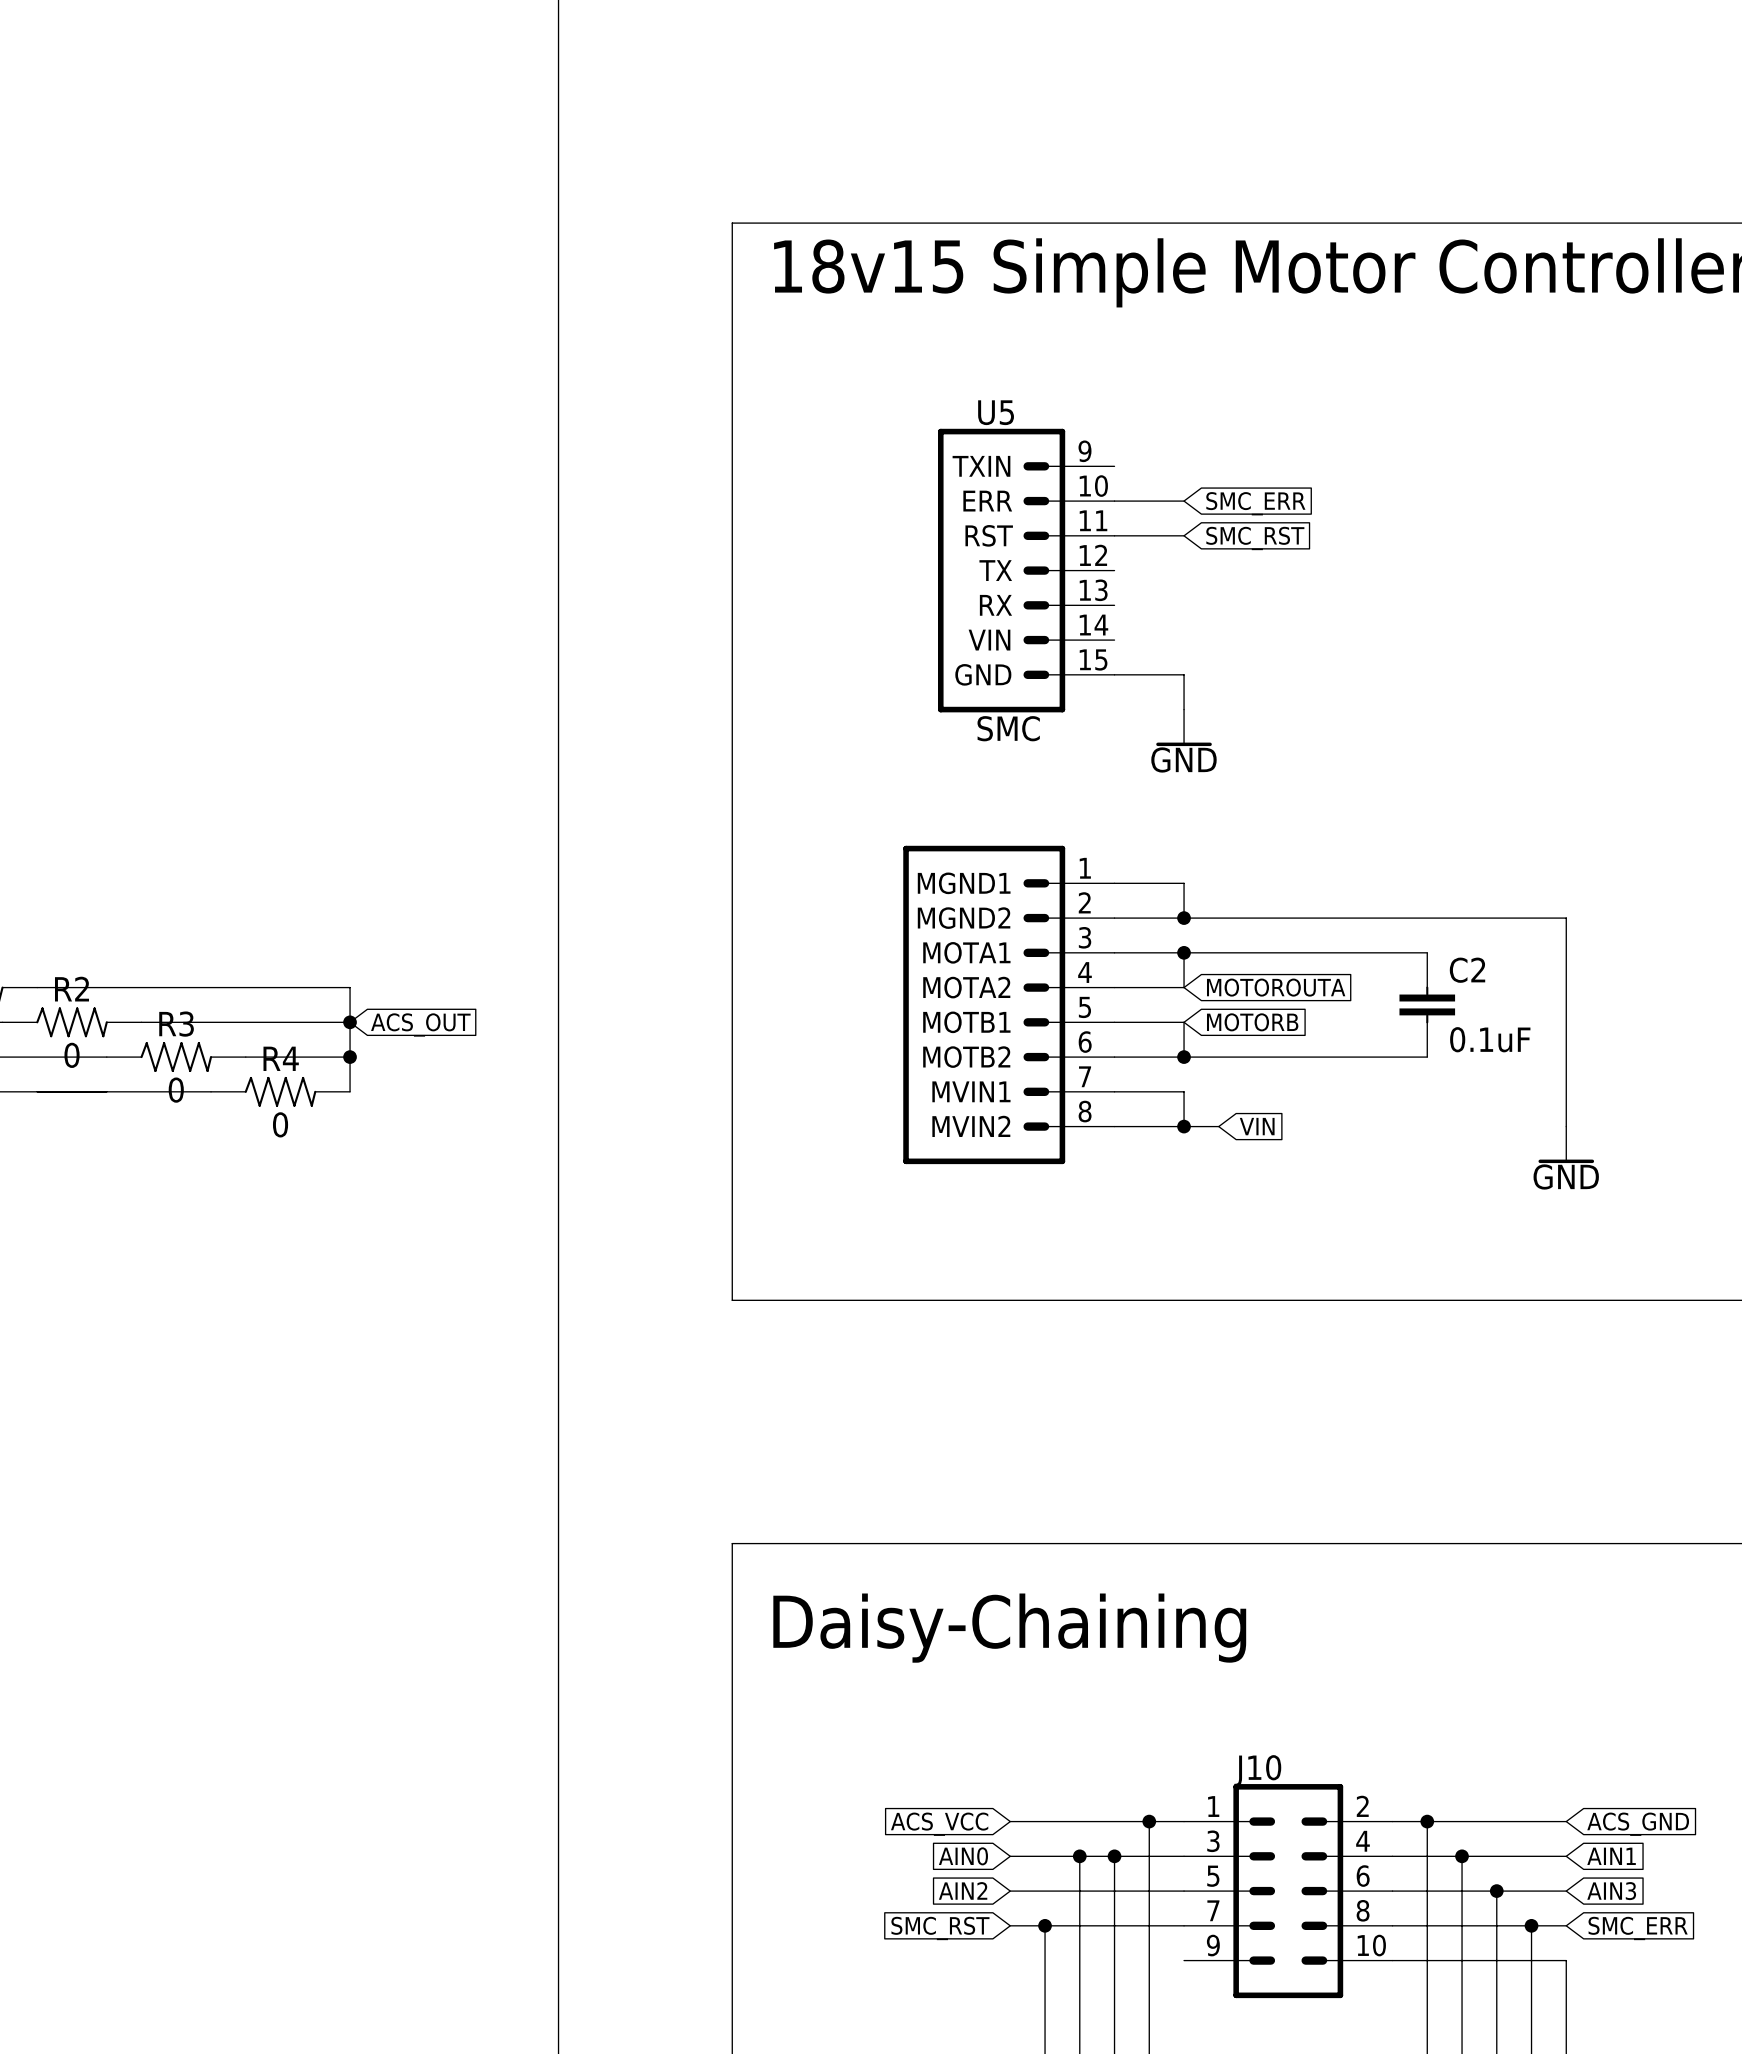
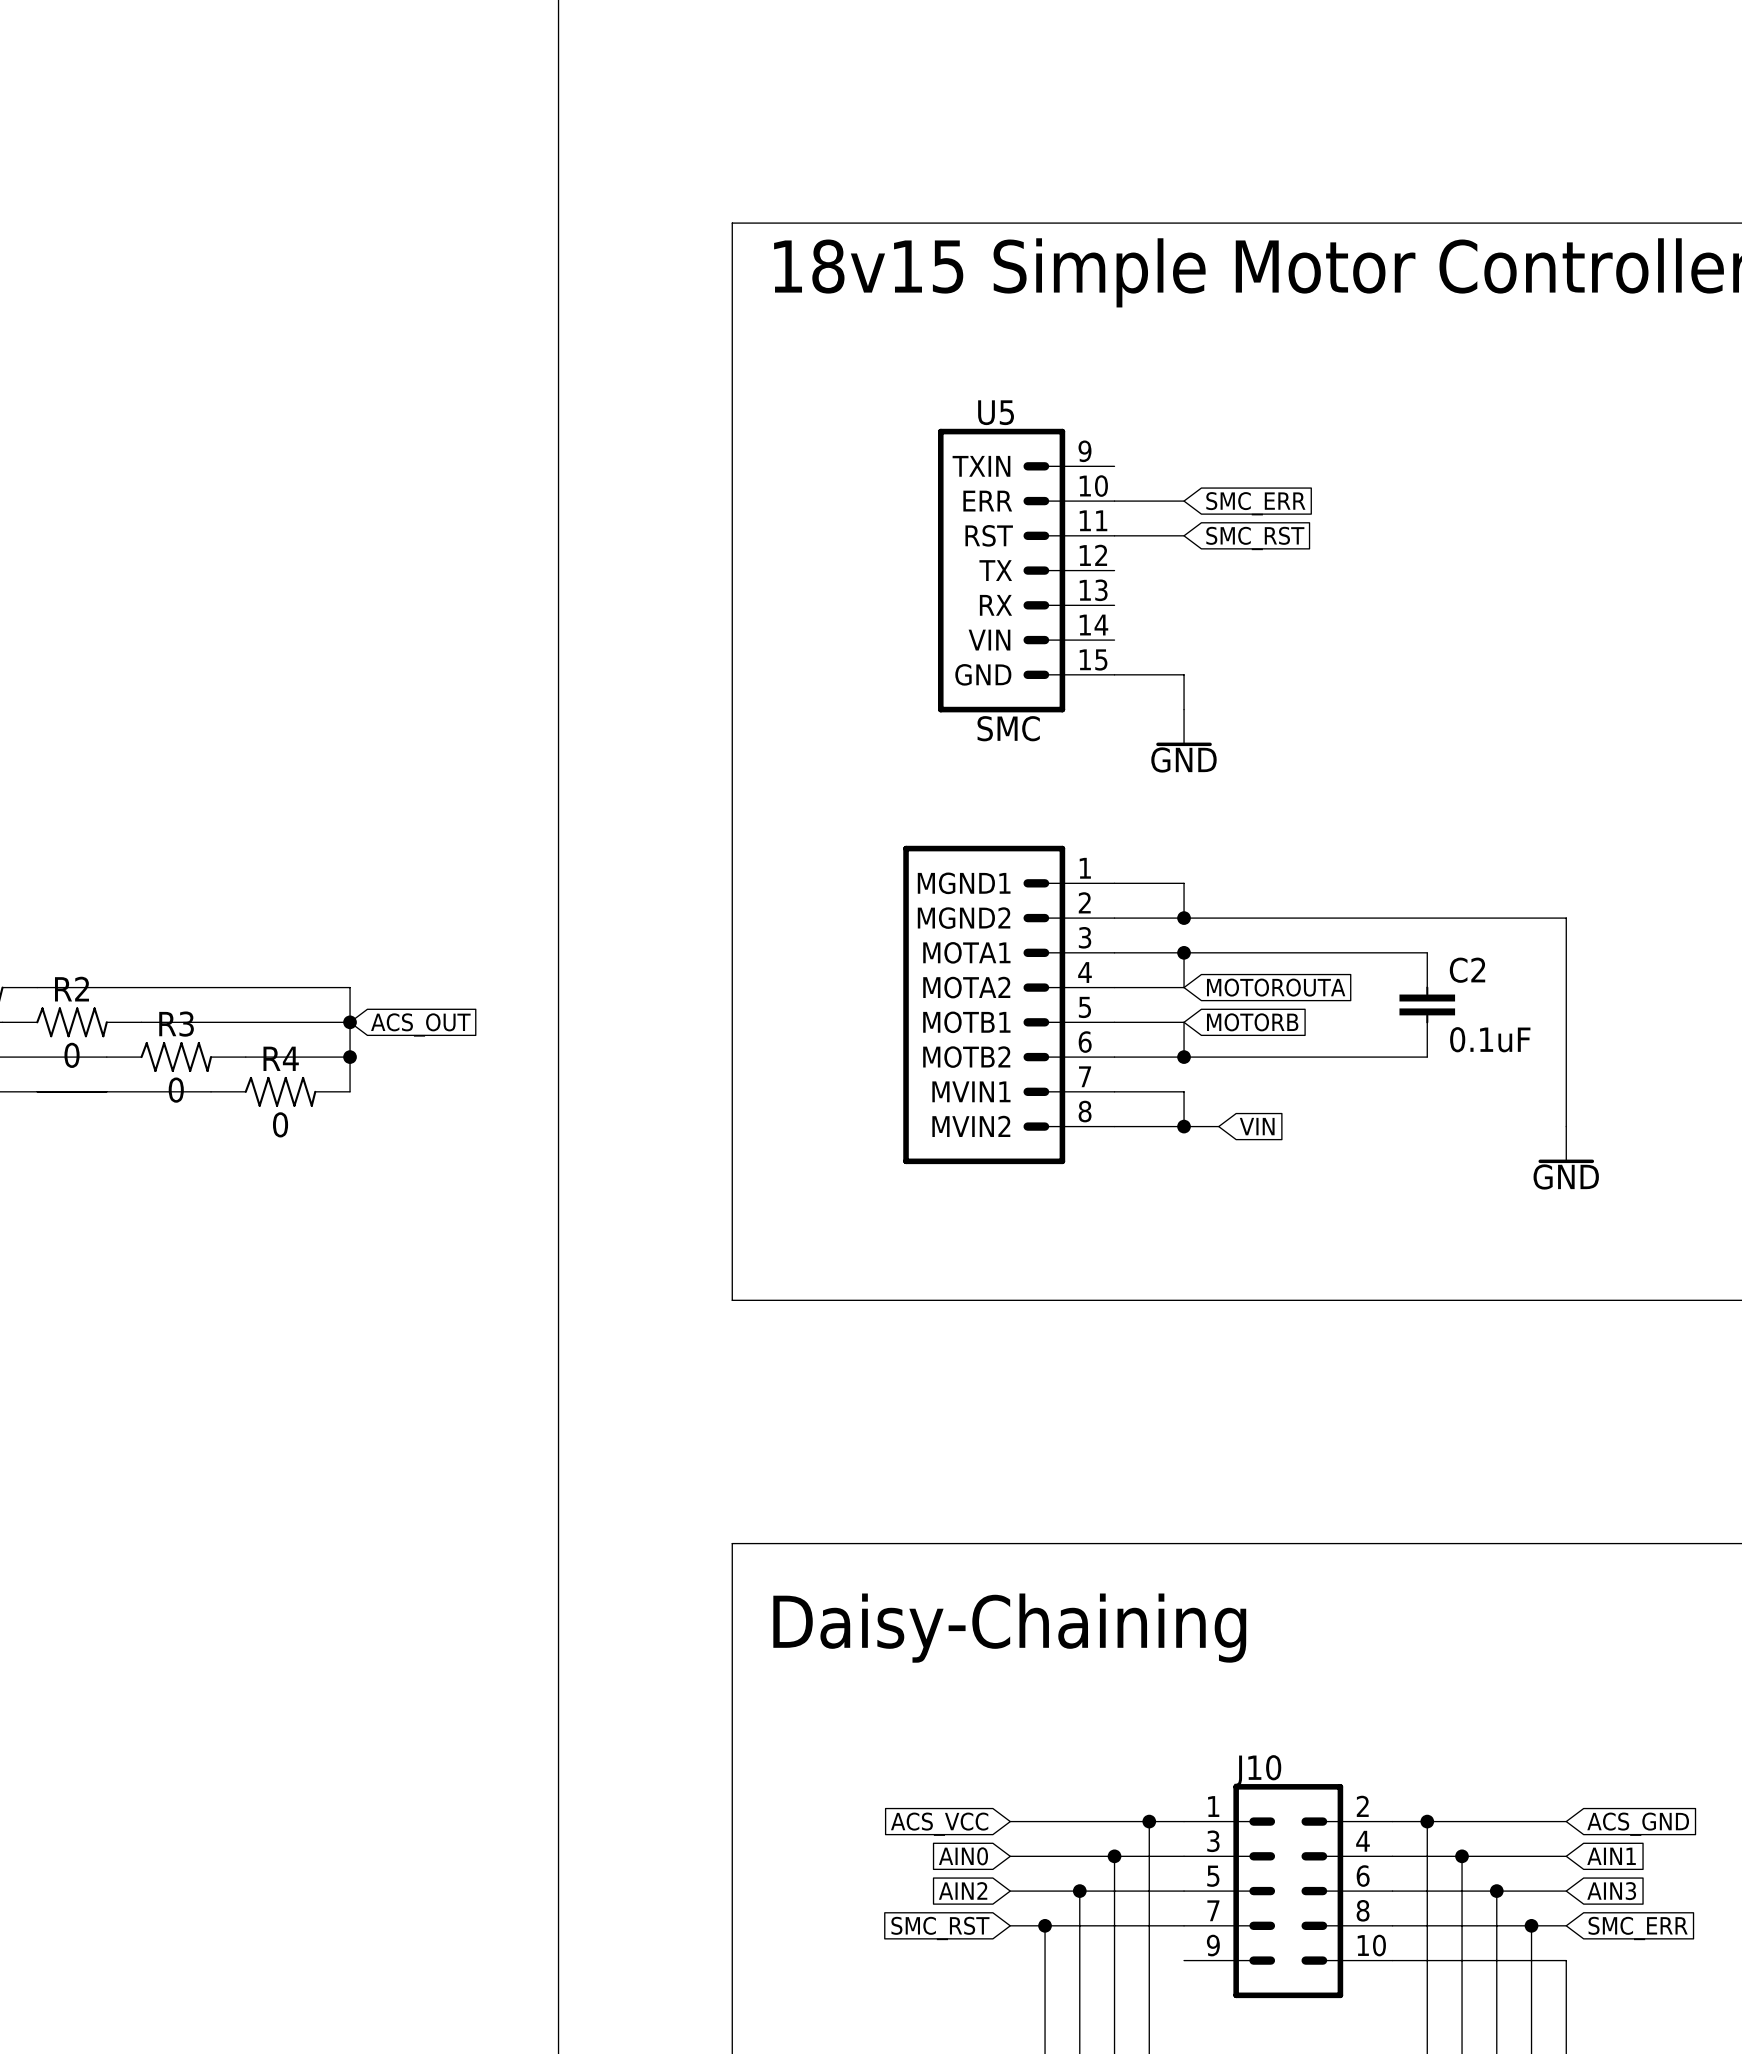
wire: (1079, 1856) (1079, 1891) -> none
junction position: (1079, 1856) -> (1079, 1891)

